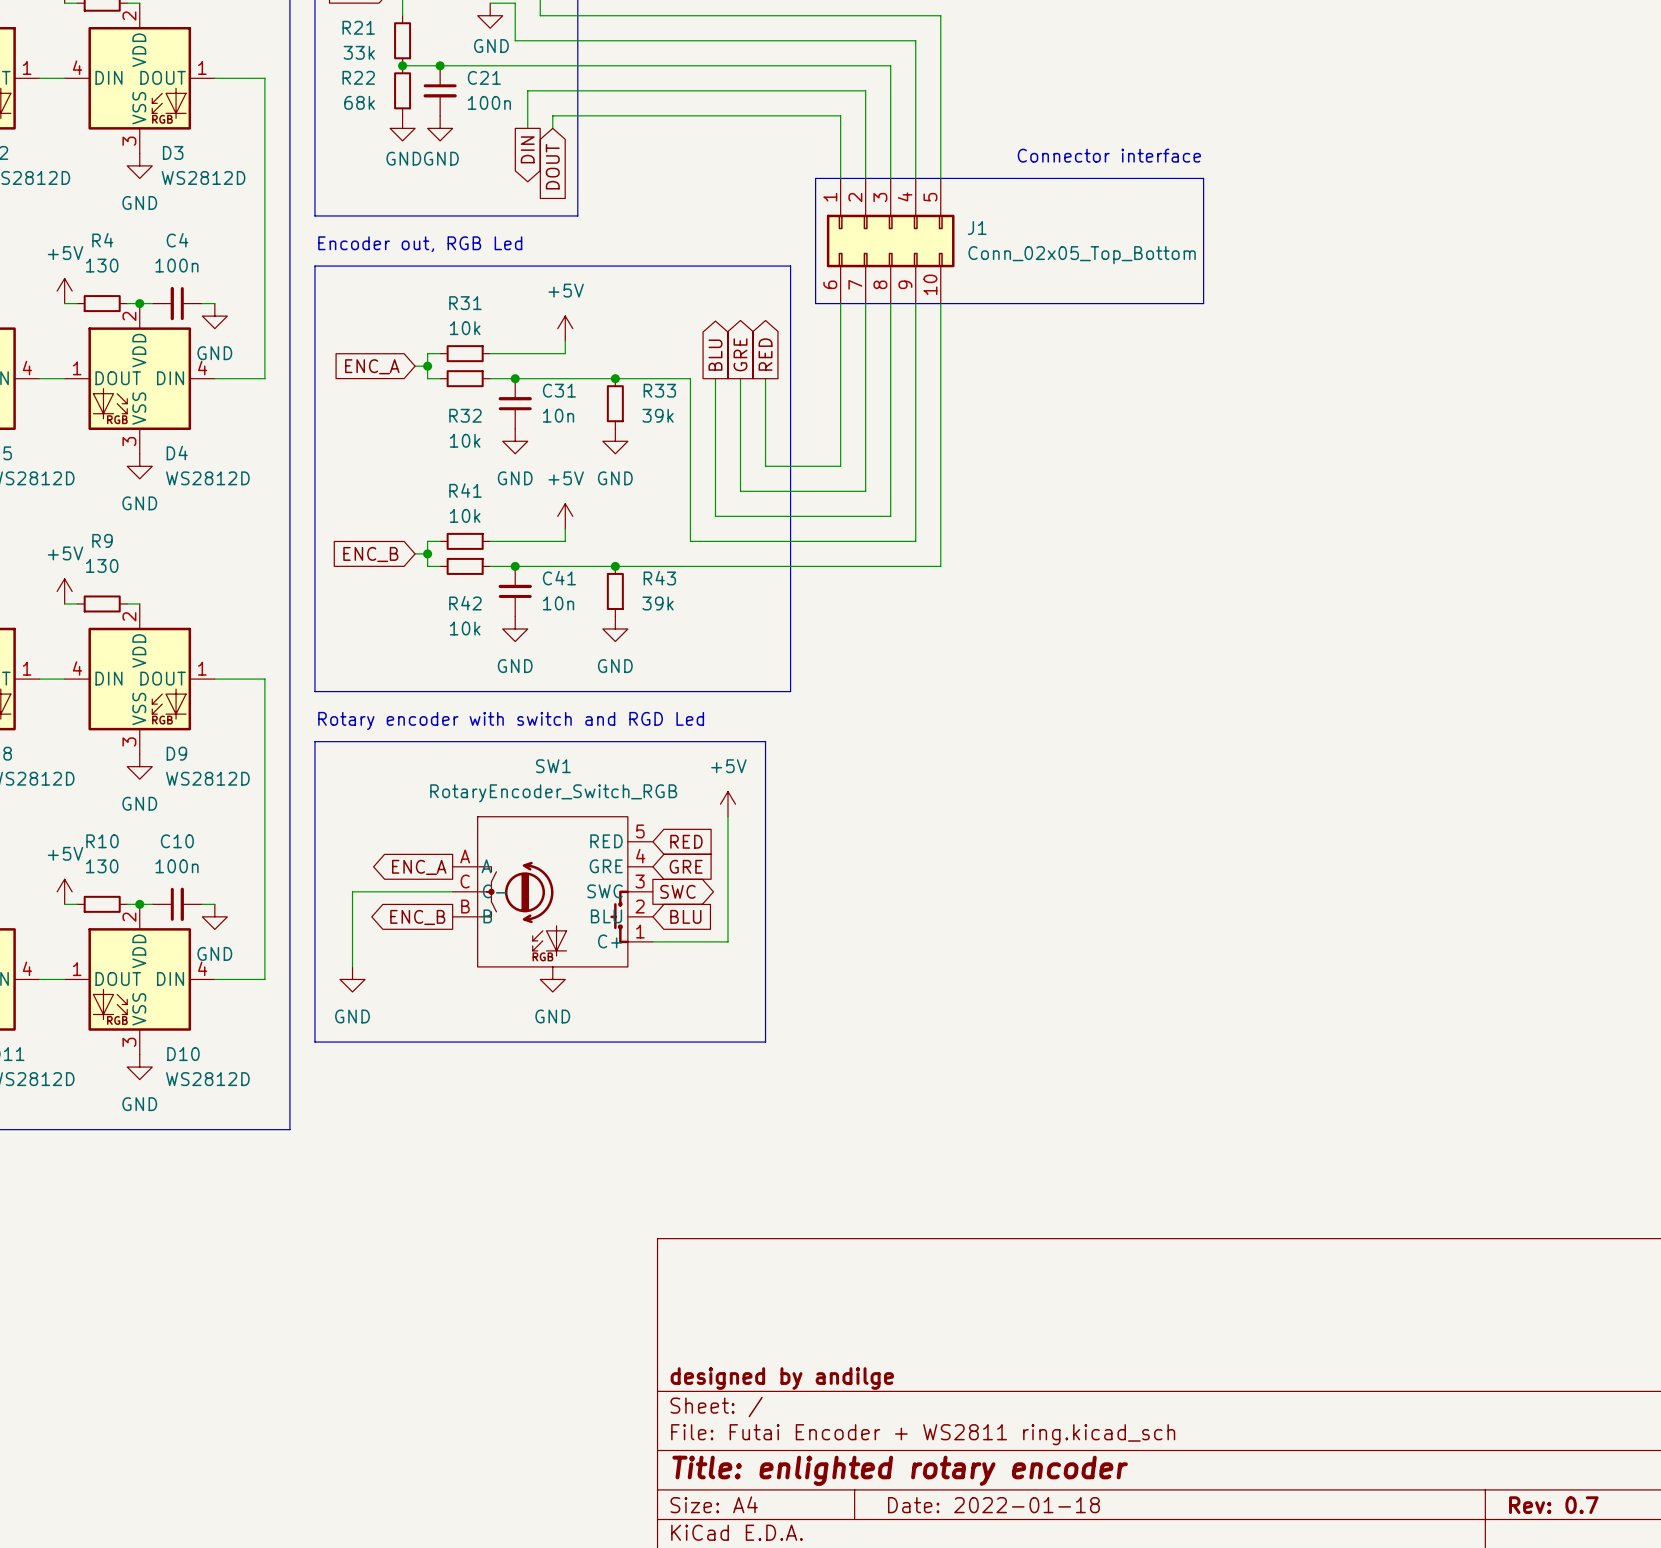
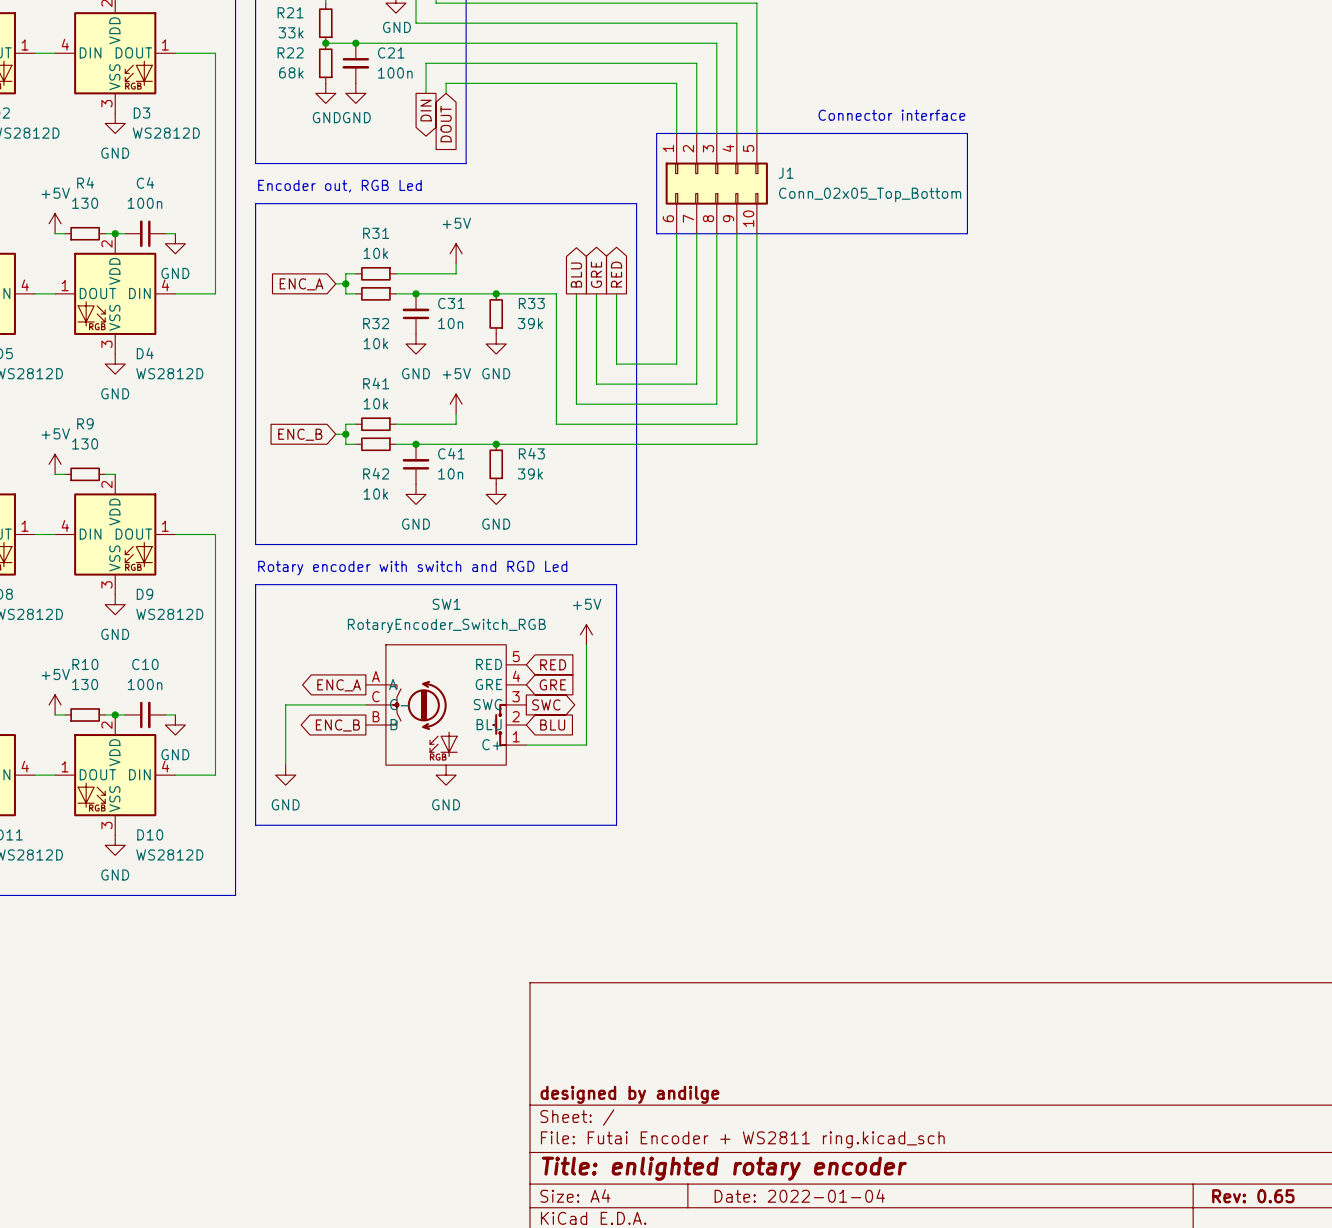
title block: Date: 2022-01-18 (993, 1505) -> Date: 2022-01-04 (799, 1195)
title block: Rev: 0.7 (1553, 1505) -> Rev: 0.65 (1253, 1196)

